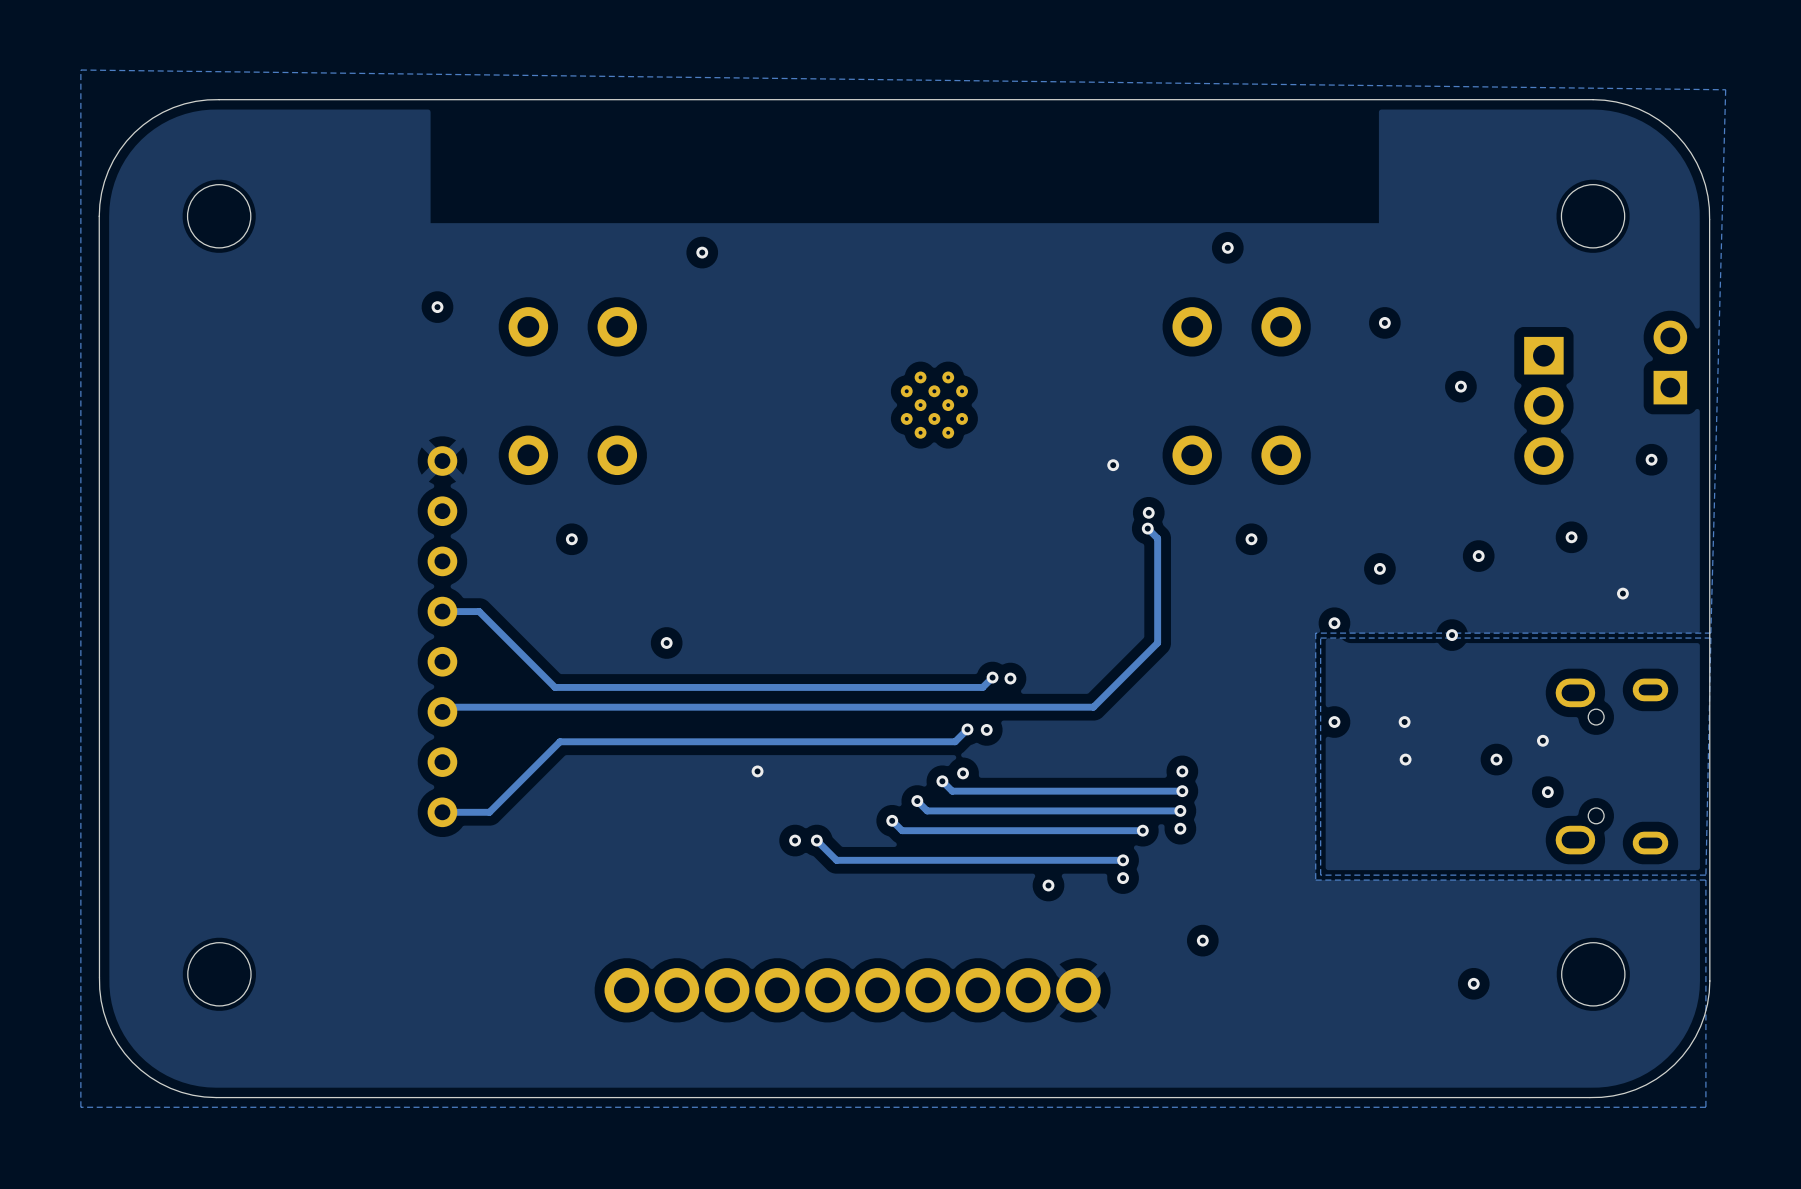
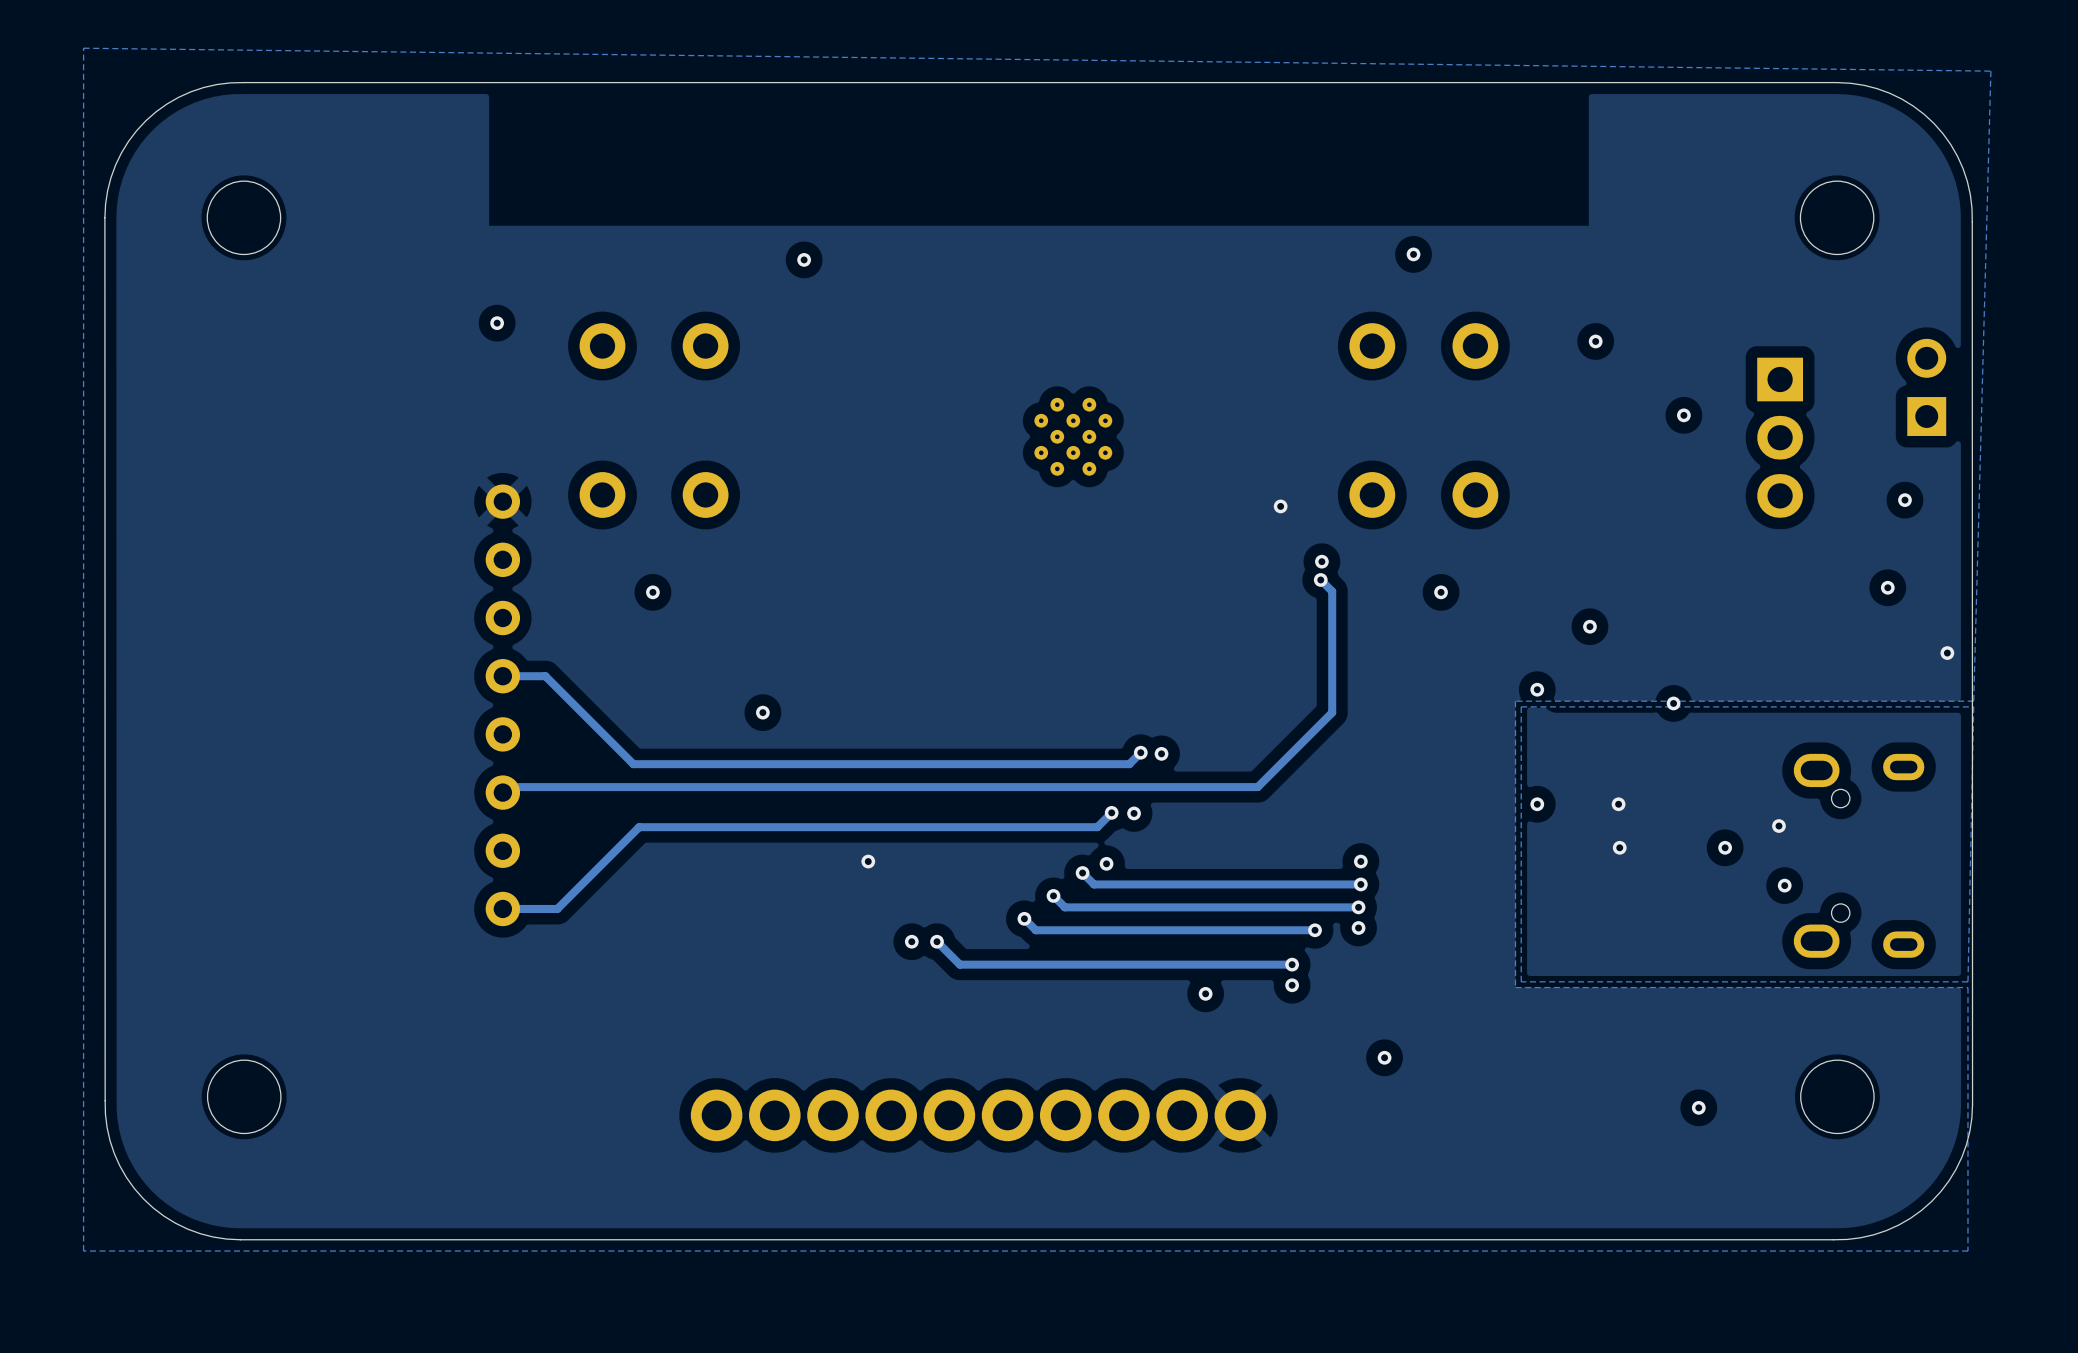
via: none -> (1887, 587)
via: (1571, 537) -> none
via: (1478, 556) -> none
via: none -> (1947, 653)
via: (1622, 593) -> none

